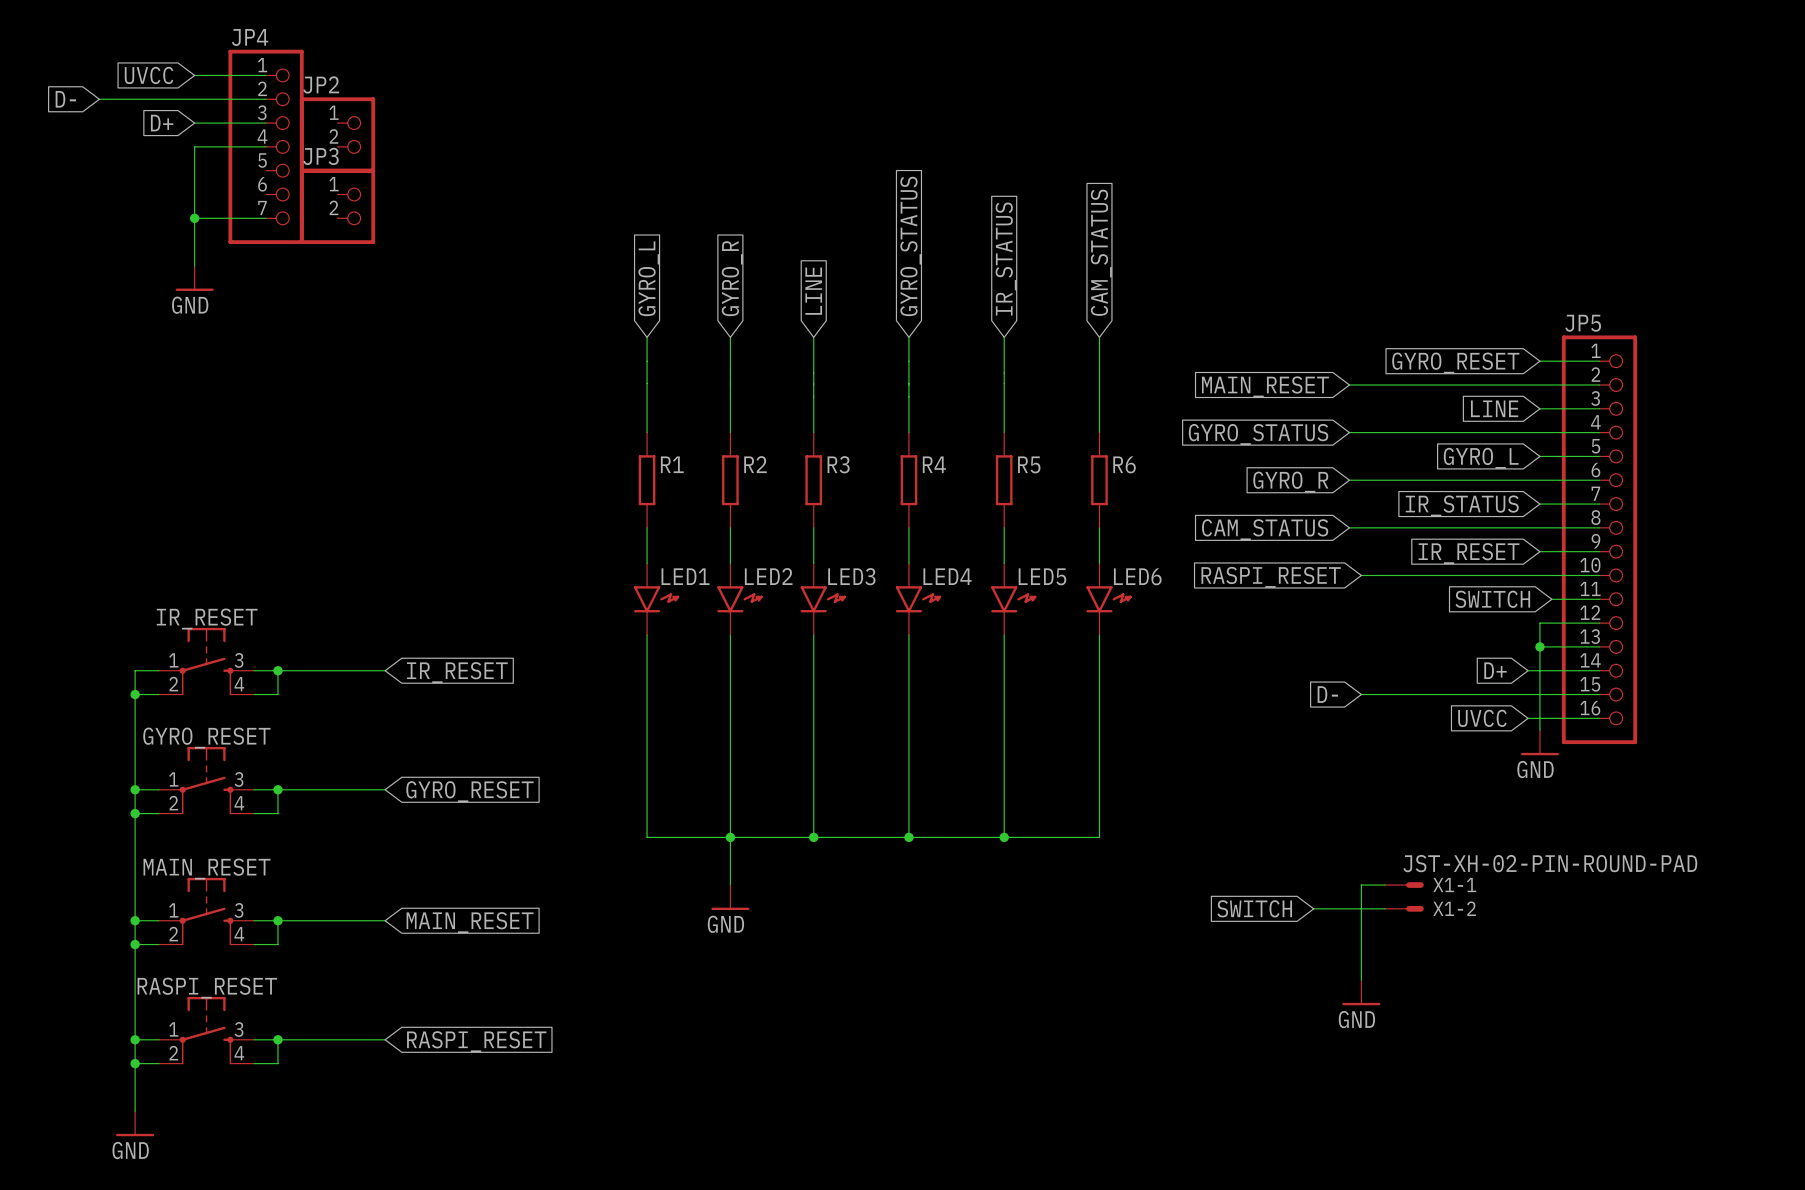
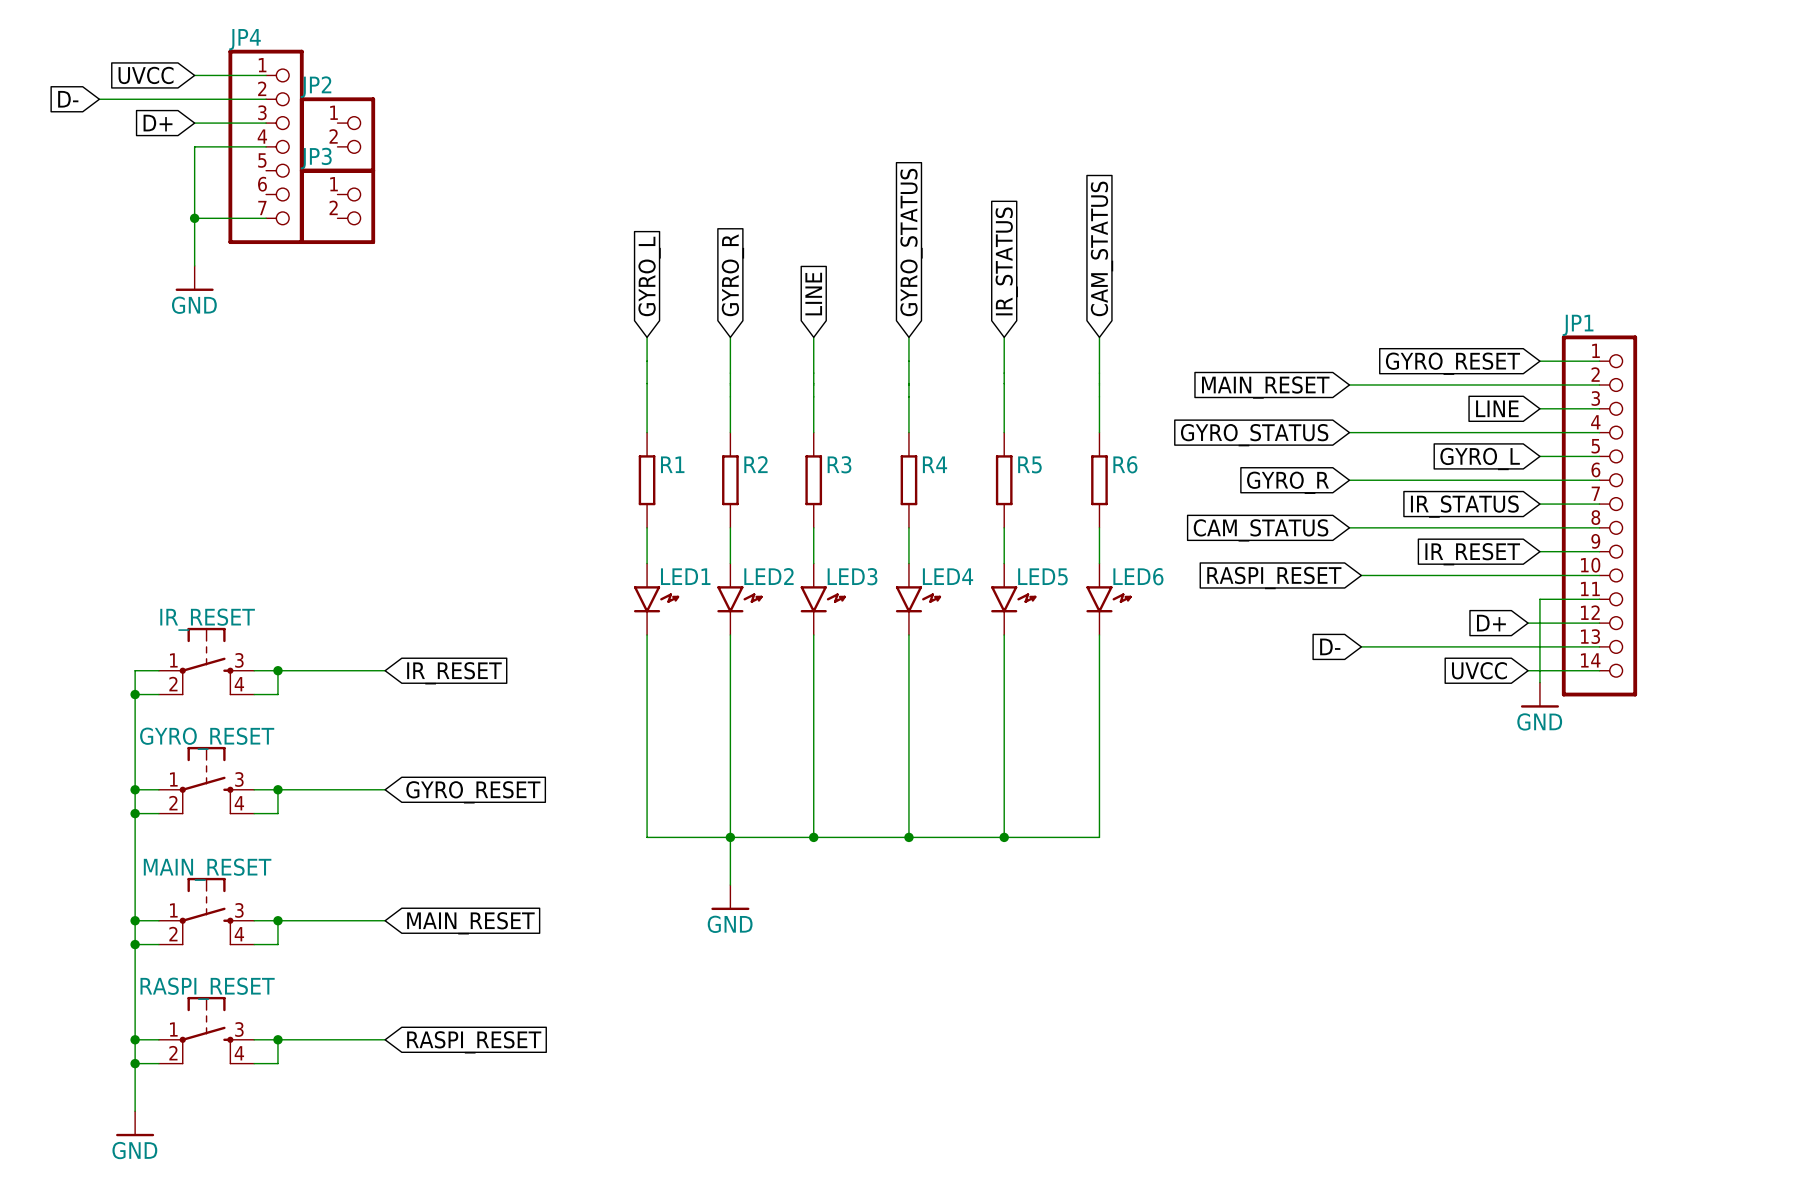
JP1: none -> (1599, 515)
JP5: (1599, 539) -> none
global label: SWITCH (1492, 599) -> none
wire: none -> (1551, 599) (1539, 599) (1539, 623) (1528, 623)
global label: none -> D+ (1491, 623)
wire: none -> (1361, 646) (1539, 646)
junction: (1539, 646) -> none
global label: D+ (1495, 670) -> UVCC (1479, 670)
global label position: D- (1327, 694) -> D- (1330, 646)
wire: (1361, 694) (1599, 694) -> none
global label: UVCC (1482, 718) -> none
wire: (1528, 718) (1599, 718) -> none
power symbol position: GND (1539, 742) -> GND (1539, 695)
wire: (1385, 885) (1361, 885) (1361, 980) -> none
X1-1: JST-XH-02-PIN-ROUND-PAD (1404, 885) -> none
global label: SWITCH (1254, 908) -> none
wire: (1313, 908) (1385, 908) -> none
X1-2: (1404, 908) -> none
power symbol: GND (1361, 992) -> none

